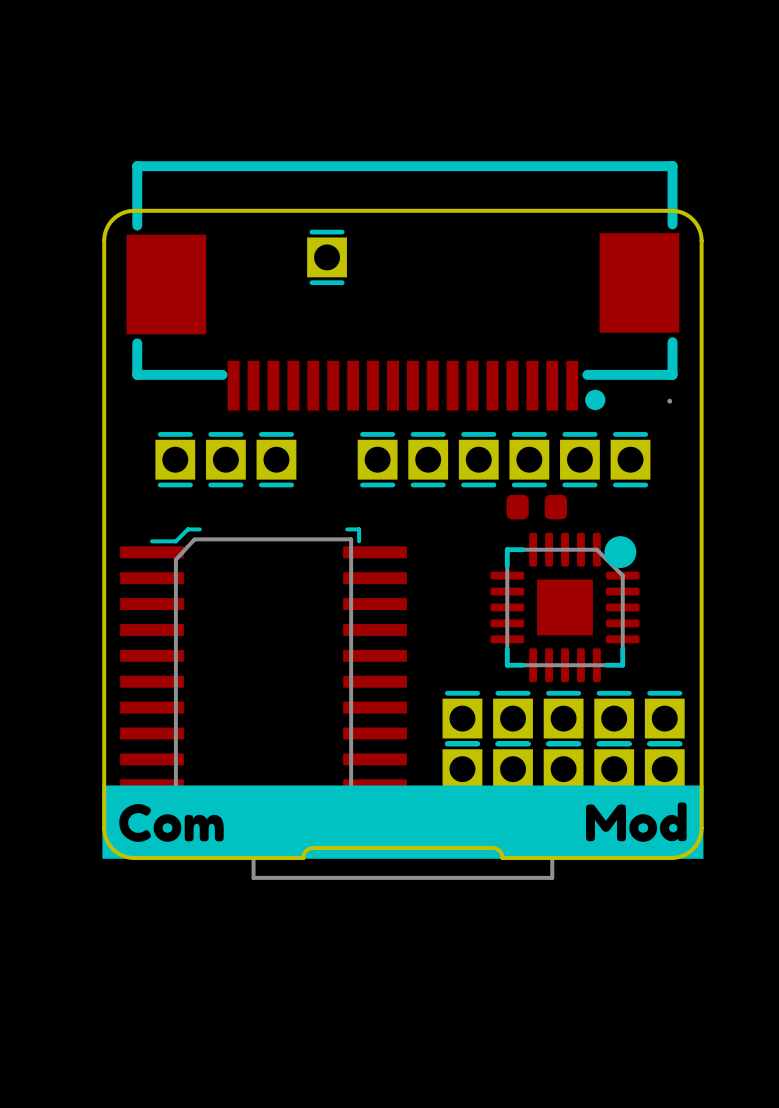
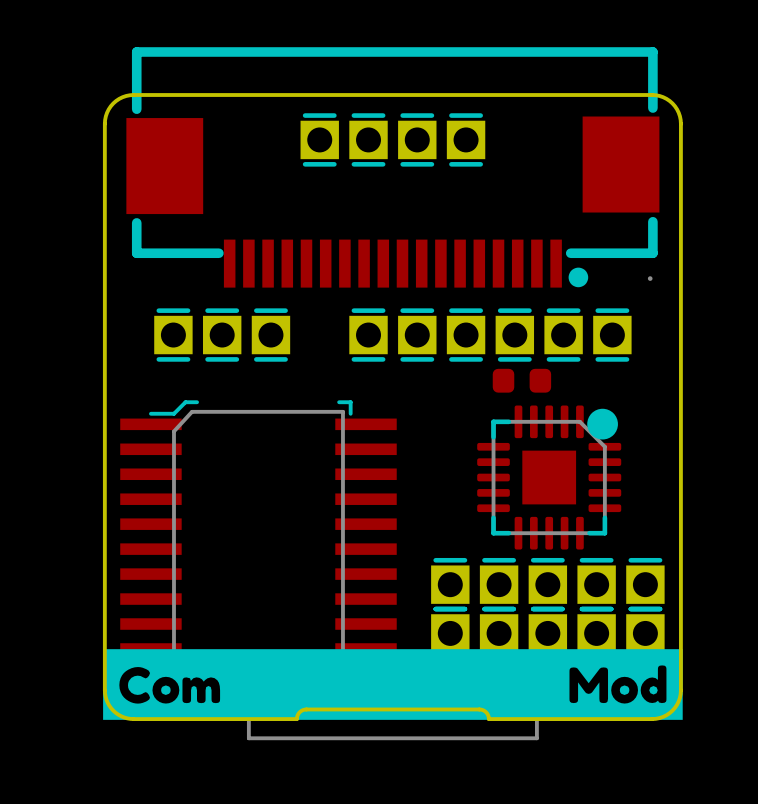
part: none -> (368, 139)
part: none -> (417, 139)
part: none -> (466, 139)

